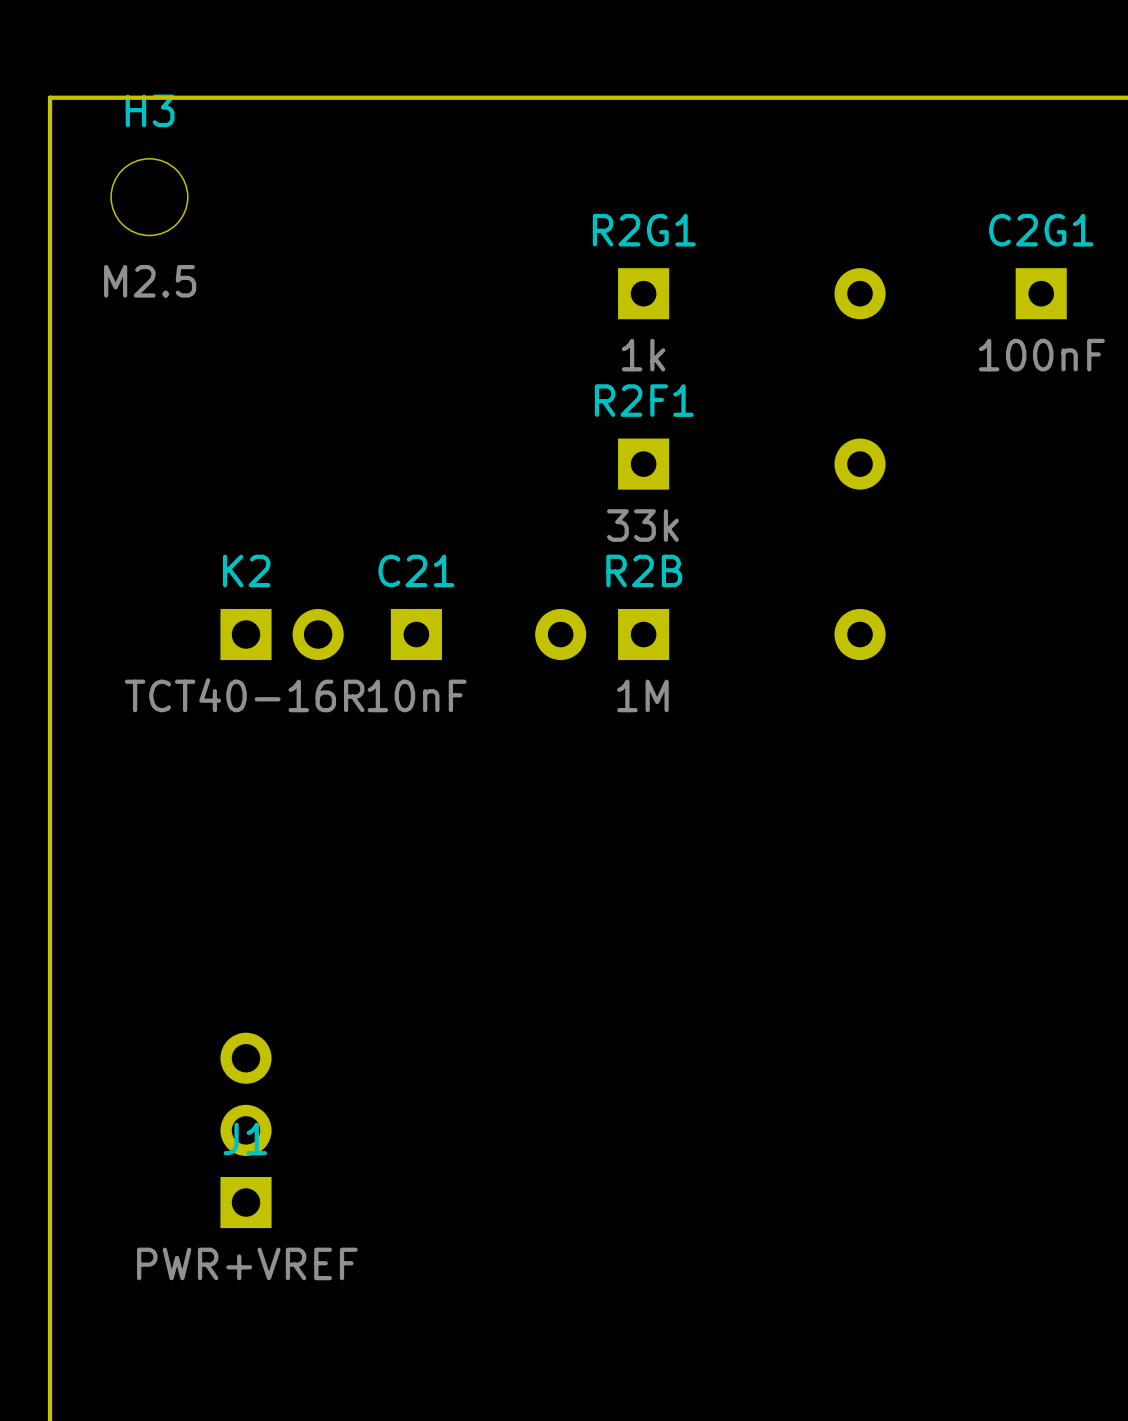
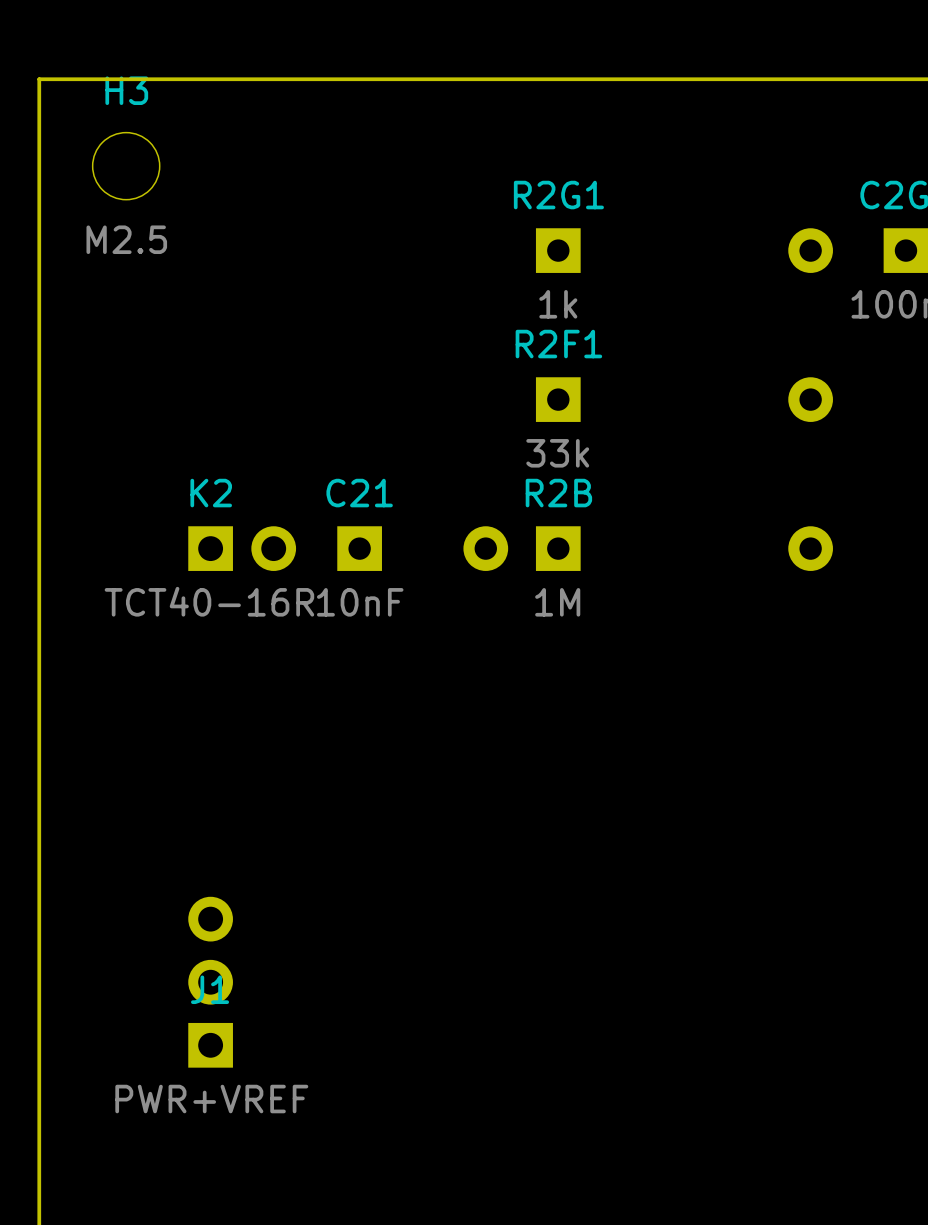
R2G1 footprint: [618, 268, 886, 320] -> [535, 228, 833, 273]
R2F1 footprint: [618, 438, 886, 490] -> [535, 377, 833, 422]
R2B footprint: [618, 608, 886, 661] -> [535, 526, 833, 571]

